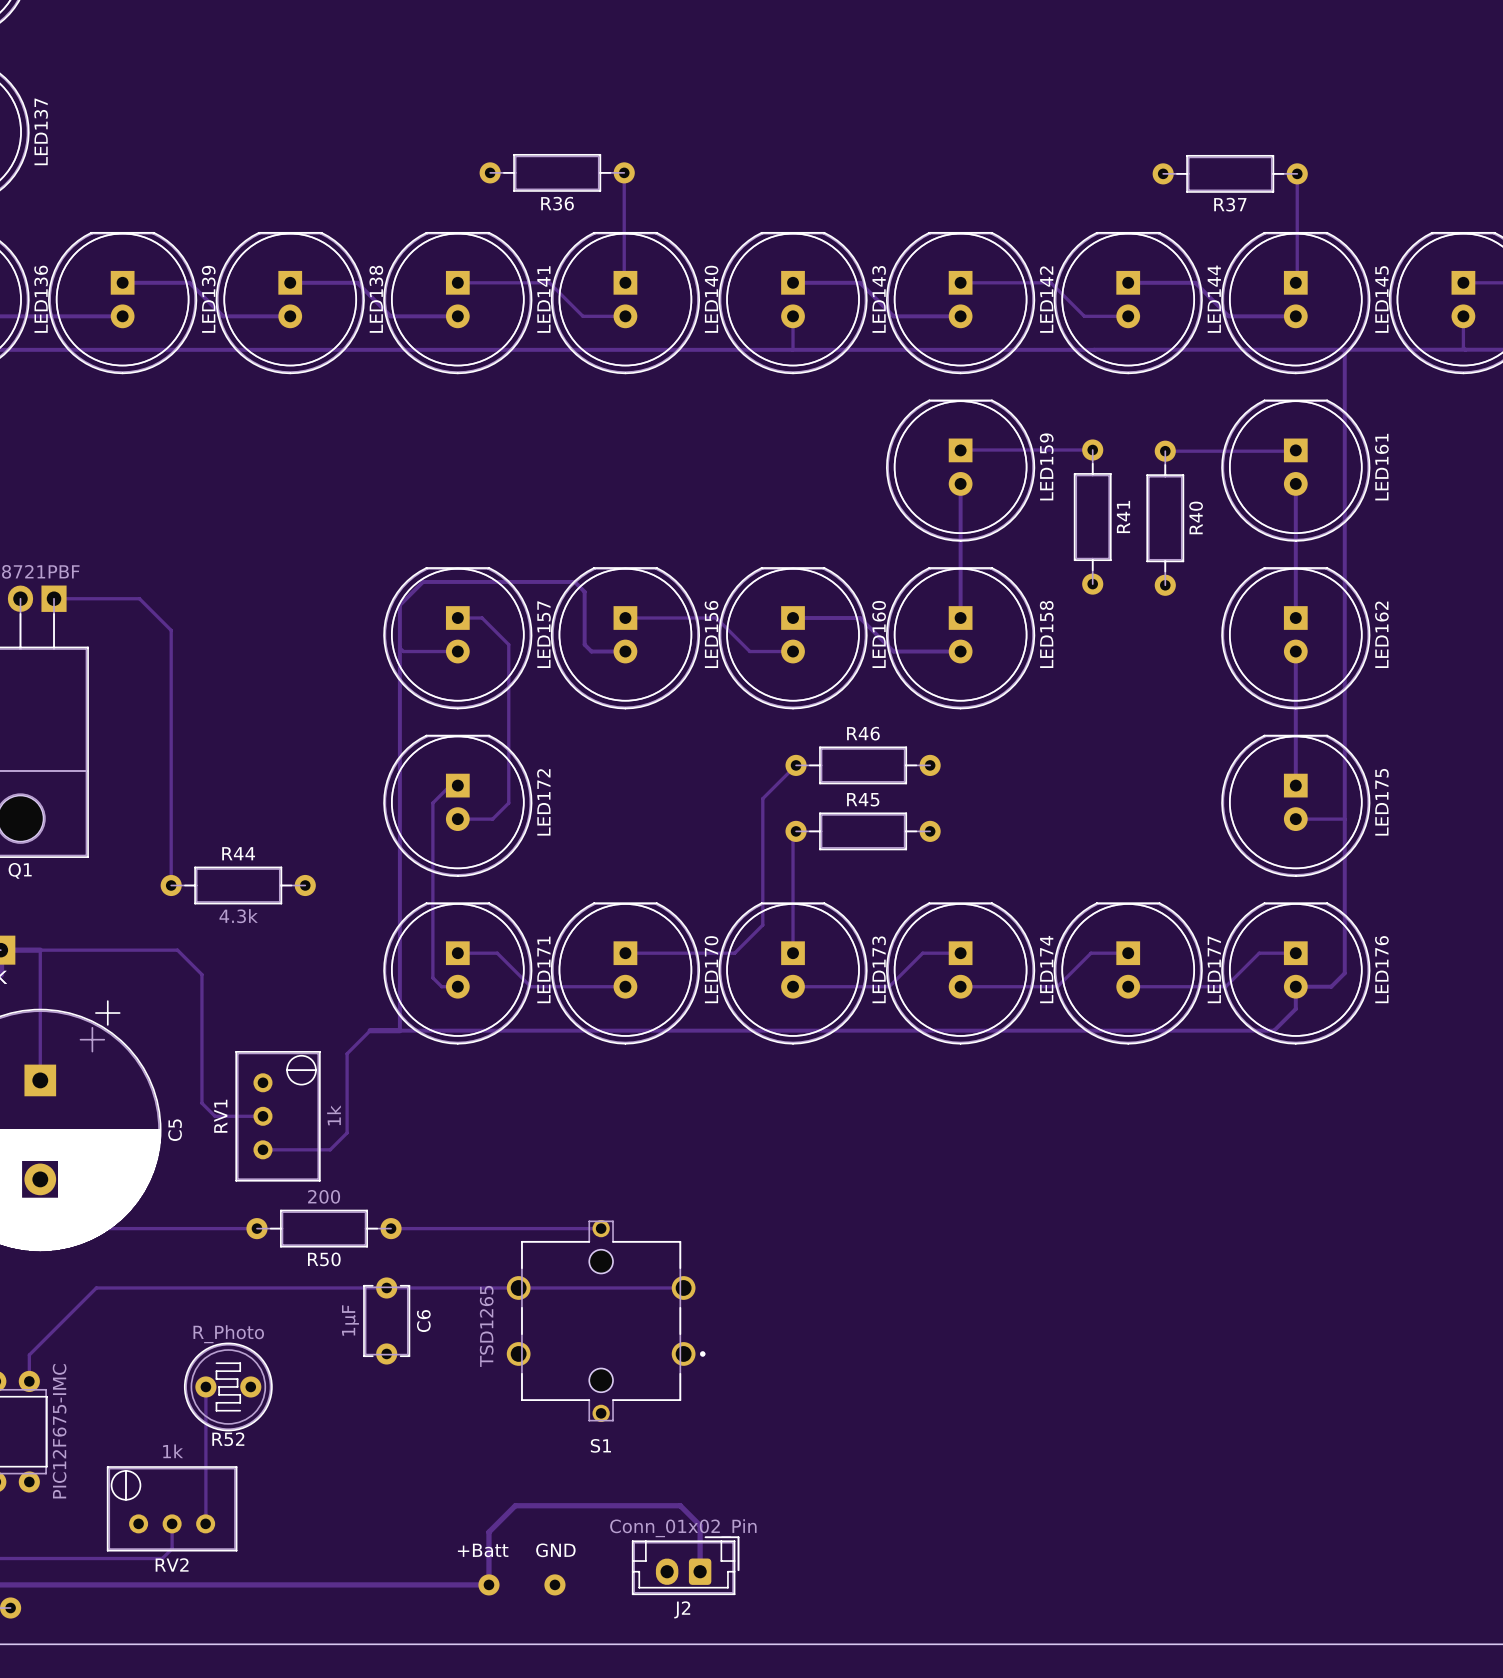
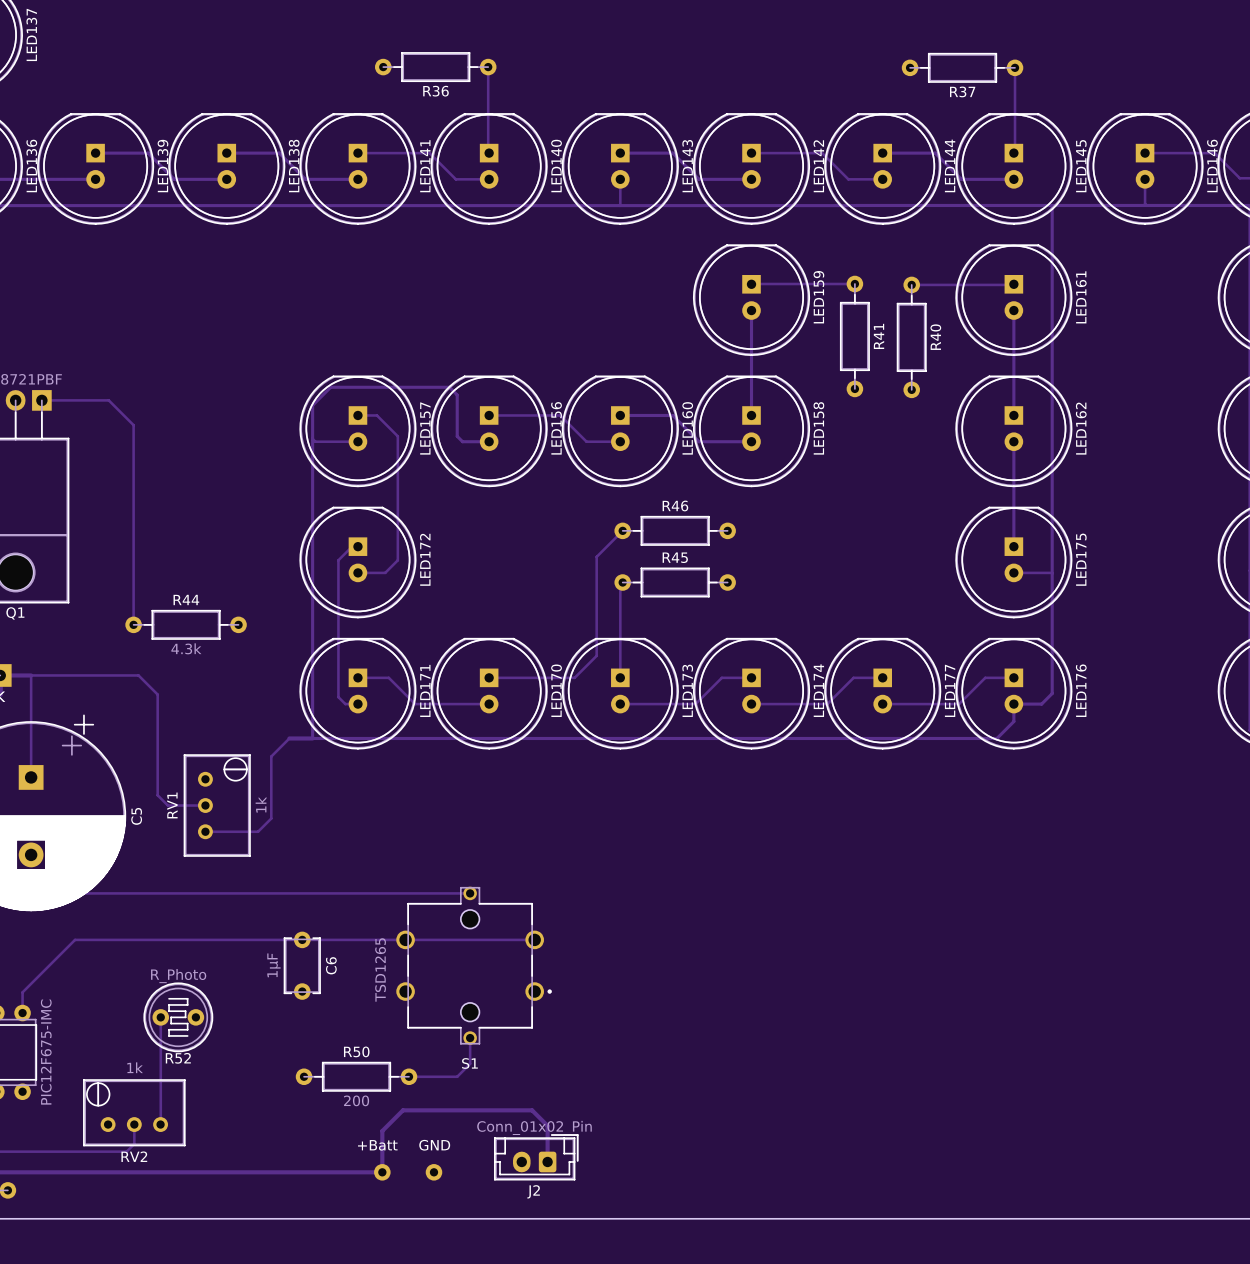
R50 value position: 200 (324, 1196) -> 200 (356, 1100)
track: none -> (200, 893) (305, 893)
R50 position: (324, 1228) -> (356, 1076)
R50 name position: R50 (324, 1259) -> R50 (356, 1051)
track: none -> (470, 1038) (470, 1063) (457, 1076) (408, 1076)

